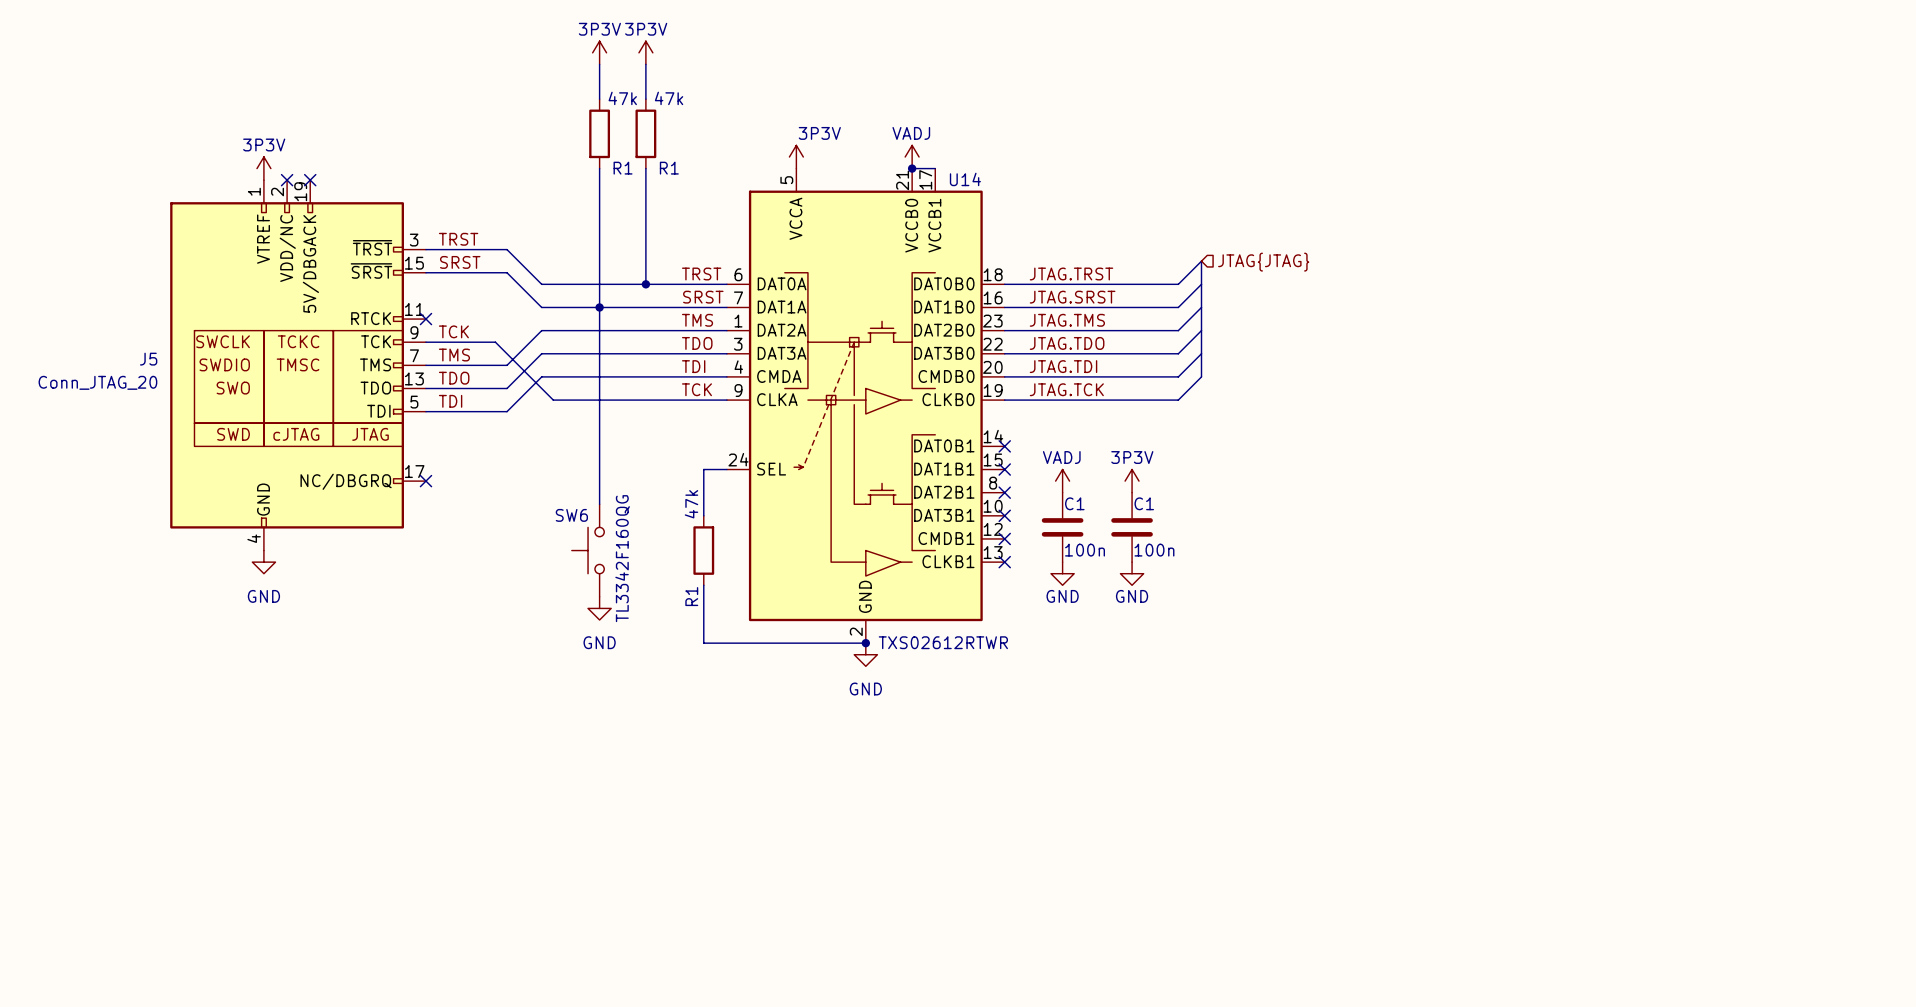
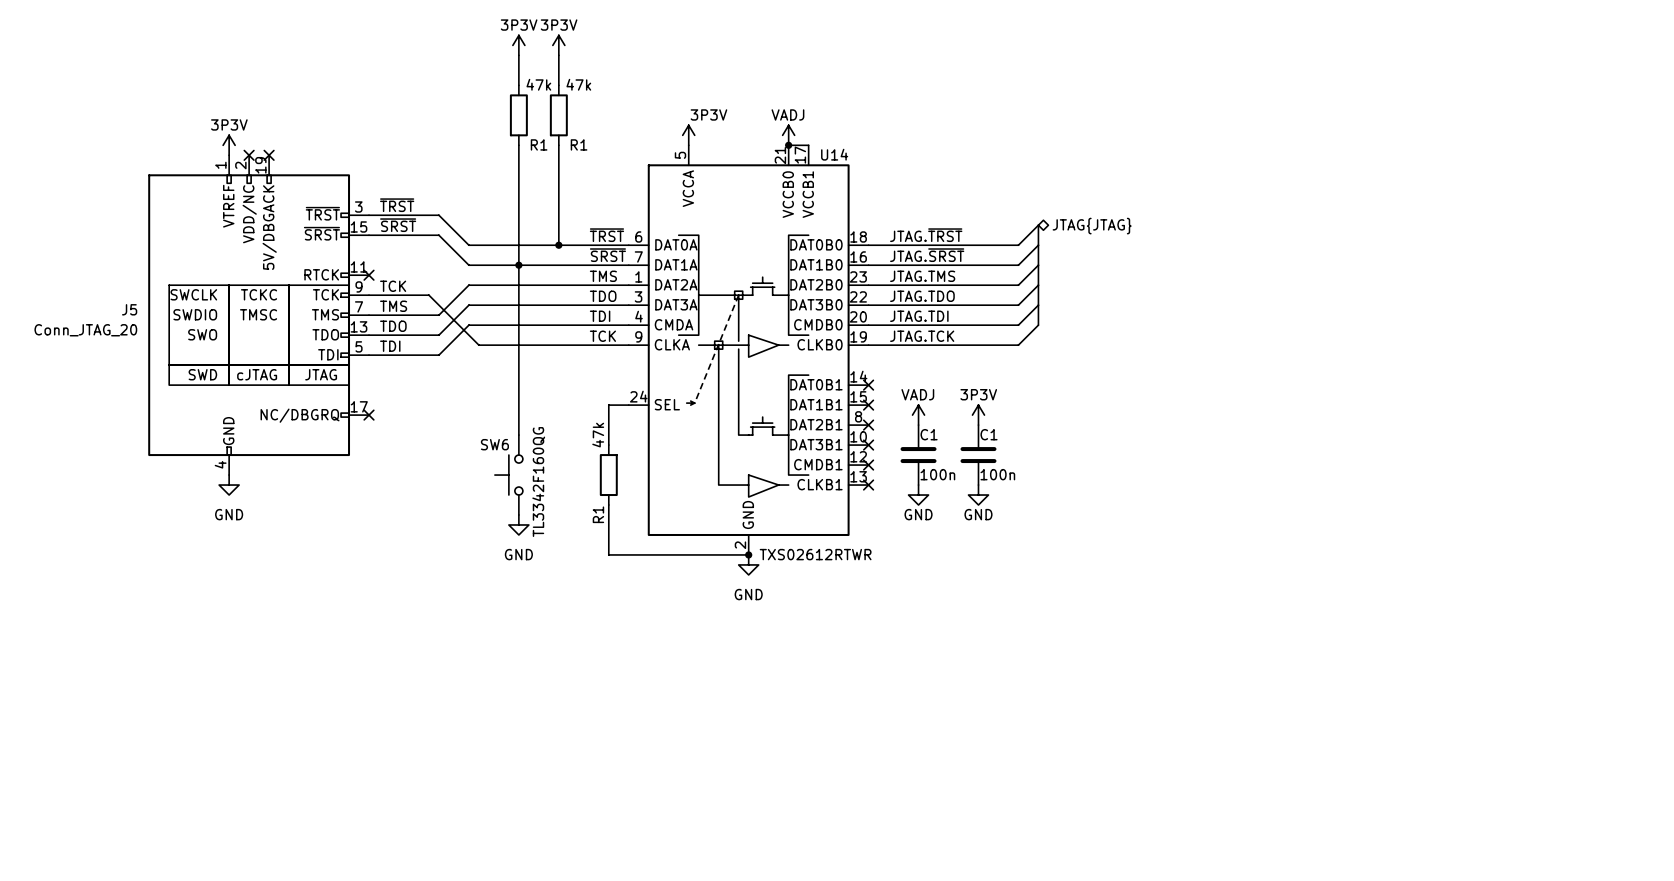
label: TRST (458, 239) -> ~{TRST} (397, 205)
label: SRST (460, 262) -> ~{SRST} (398, 225)
hierarchical label shape: input (1263, 262) -> bidirectional (1092, 226)
label: TRST (701, 274) -> ~{TRST} (606, 235)
label: JTAG.TRST (1071, 274) -> JTAG.~{TRST} (926, 235)
label: SRST (703, 297) -> ~{SRST} (607, 255)
label: JTAG.SRST (1072, 297) -> JTAG.~{SRST} (927, 255)

